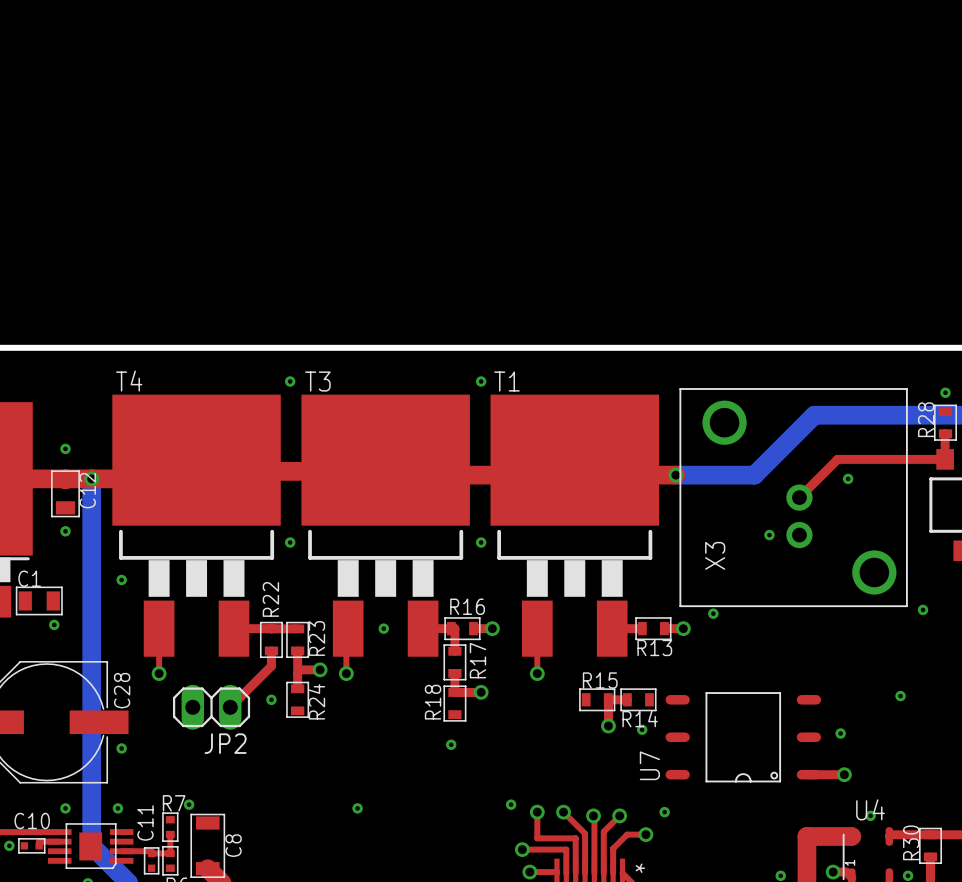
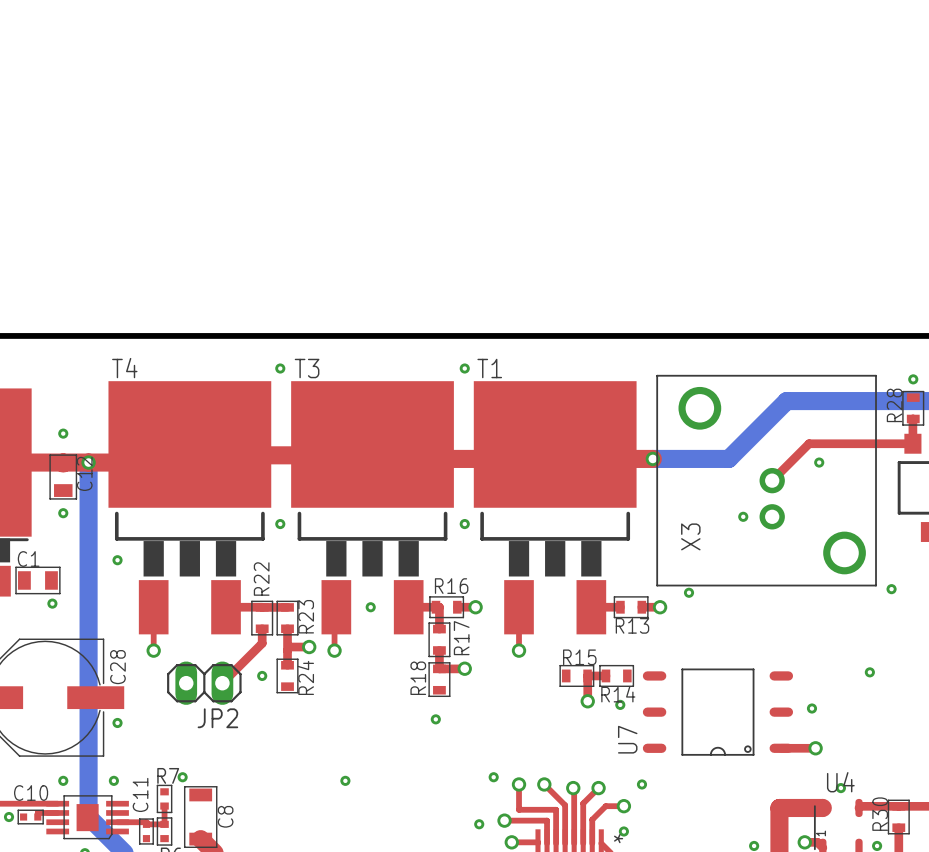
via: none -> (479, 824)
via: none -> (623, 831)

